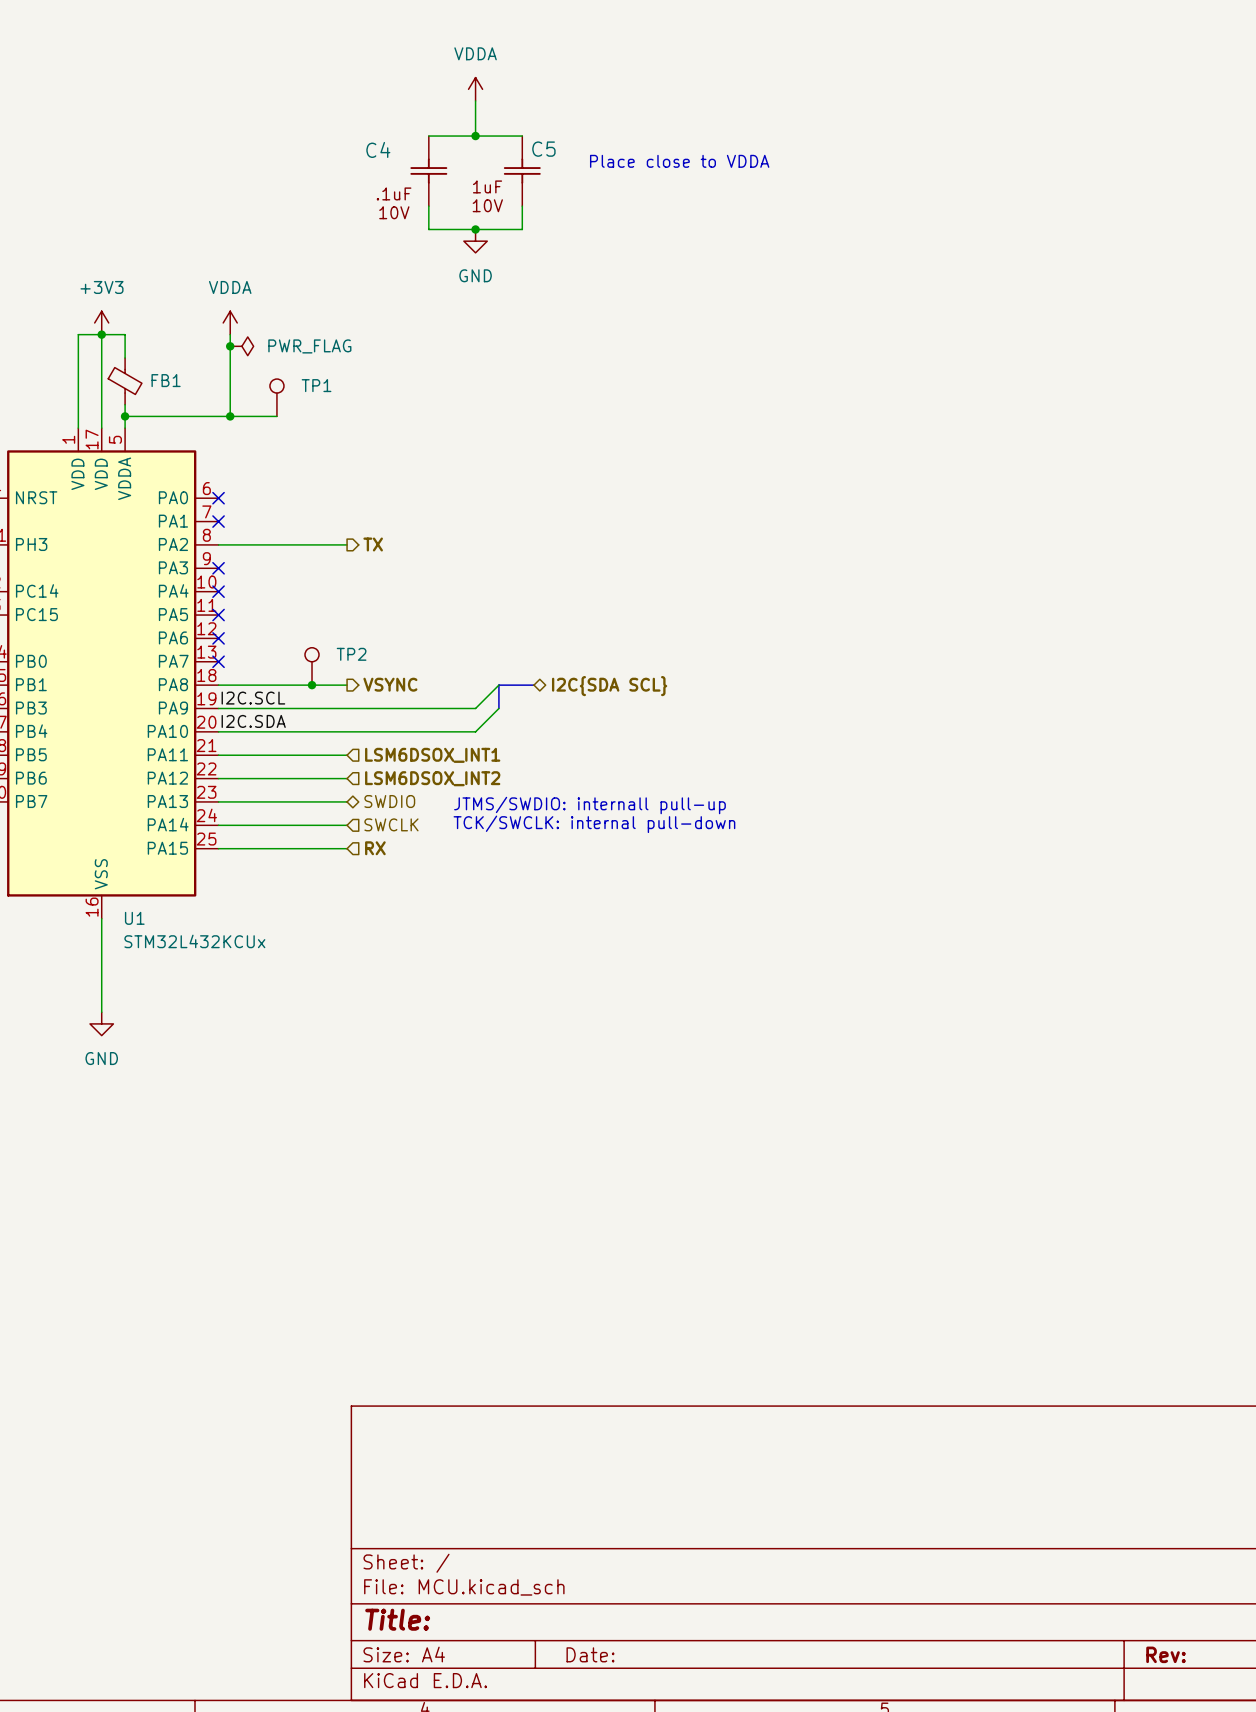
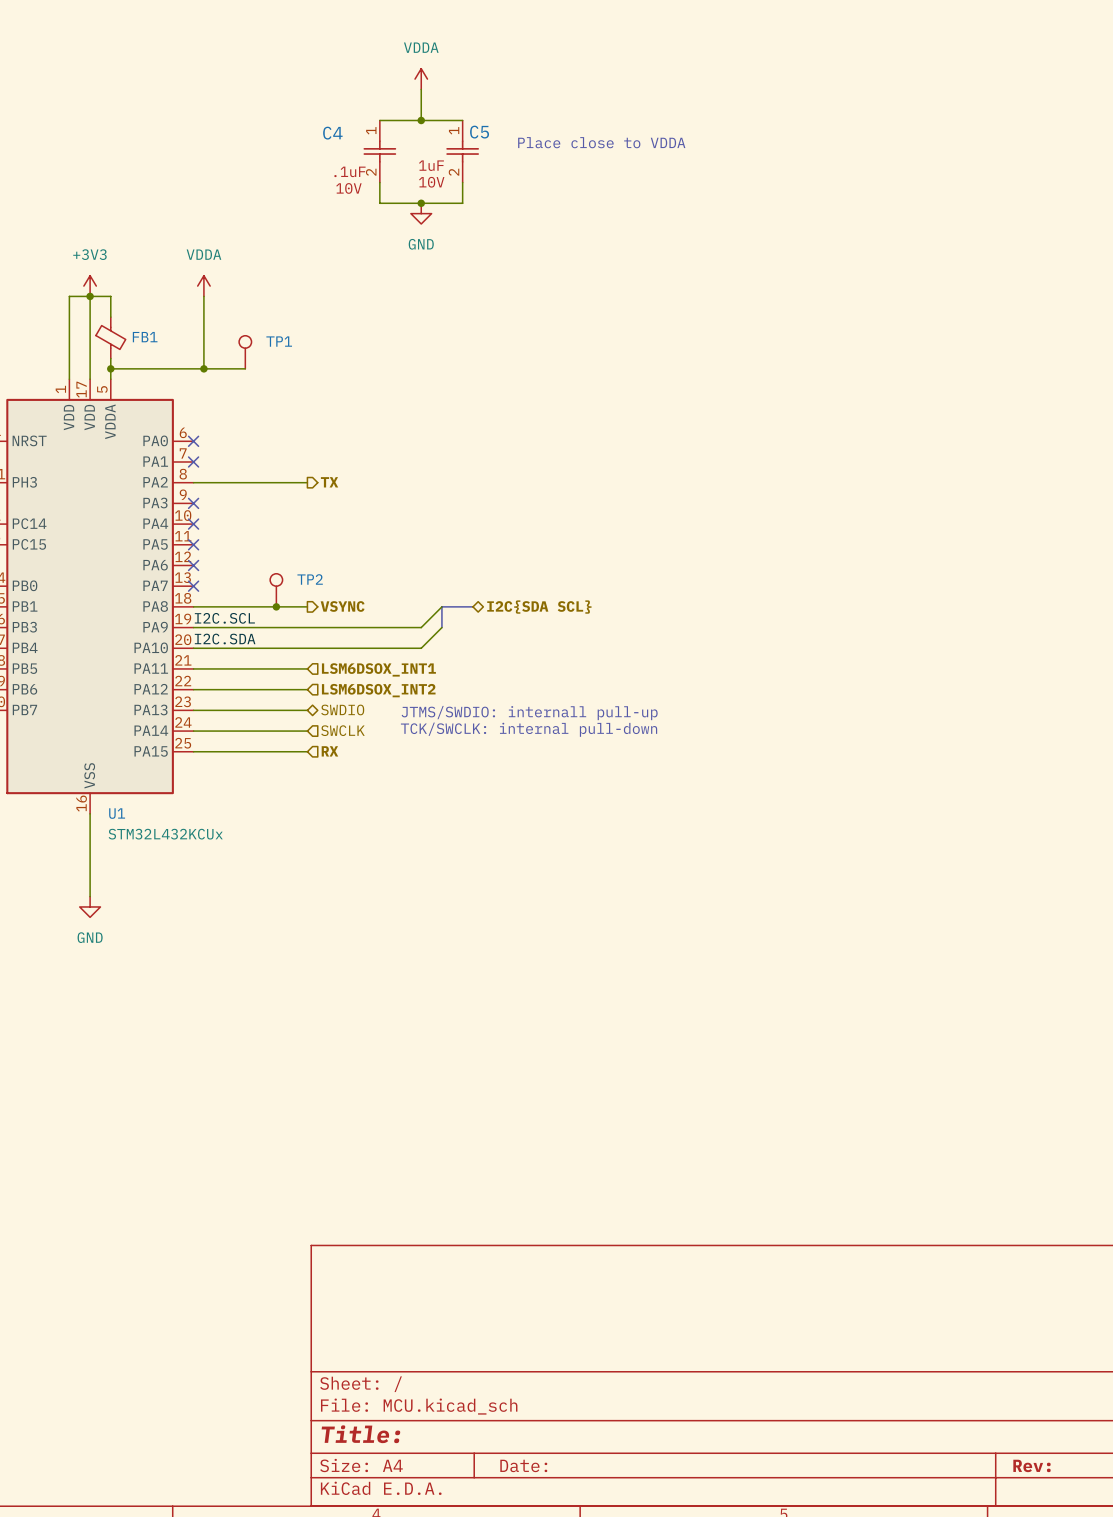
C4 pin number: none -> 1 (371, 130)
C5 pin number: none -> 1 (454, 130)
C4 pin number: none -> 2 (371, 172)
C5 pin number: none -> 2 (454, 172)
junction: (230, 346) -> none
power symbol: PWR_FLAG (241, 346) -> none

